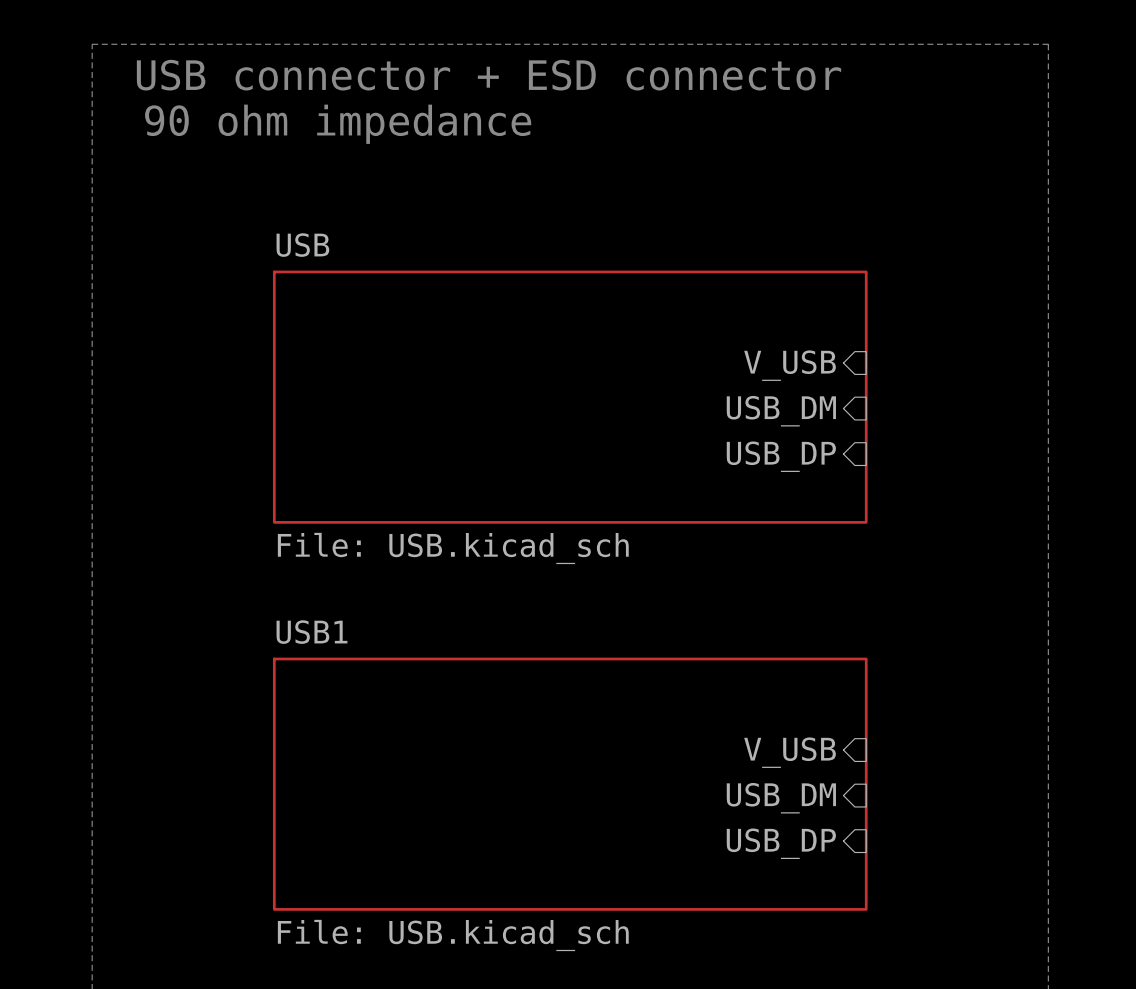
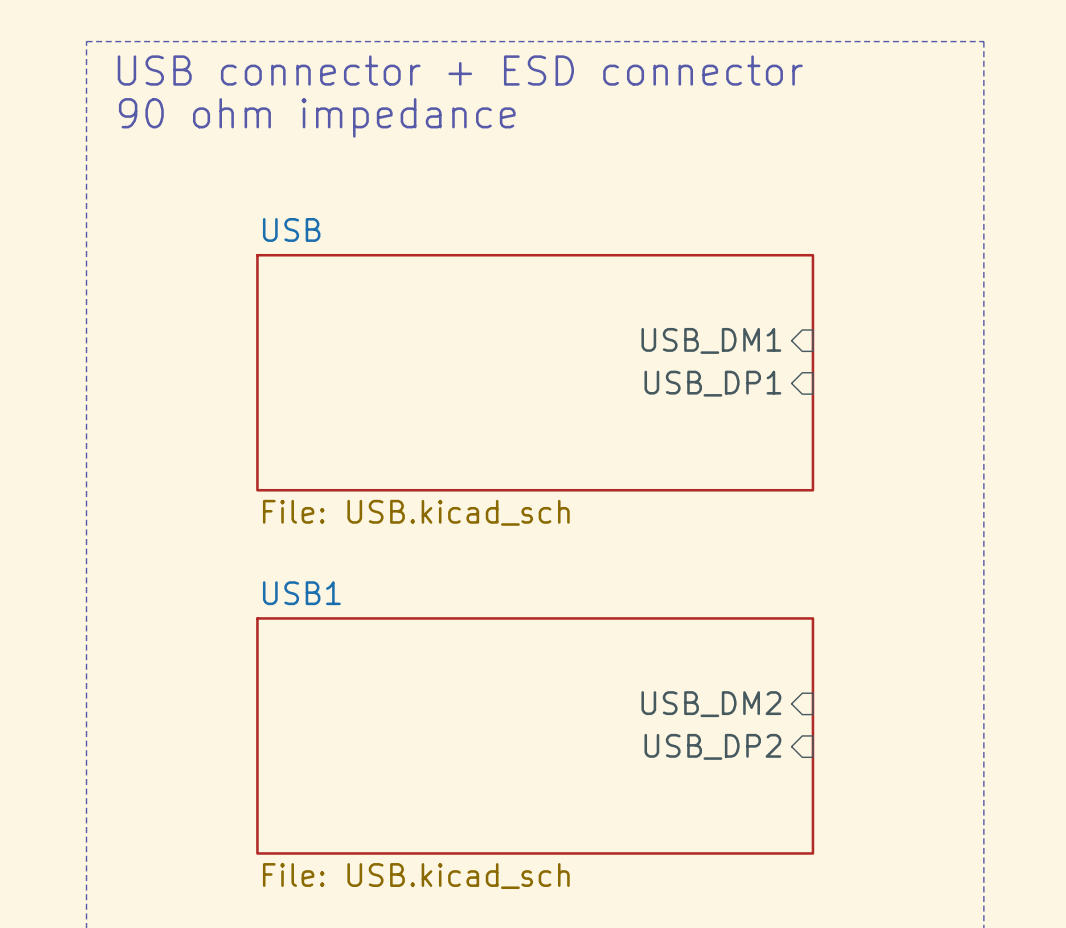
sheet pin: V_USB (790, 365) -> USB_DM1 (711, 340)
sheet pin: USB_DM (781, 411) -> USB_DP1 (712, 383)
sheet pin: USB_DP (781, 456) -> none
sheet pin: V_USB (790, 752) -> USB_DM2 (711, 704)
sheet pin: USB_DM (781, 798) -> USB_DP2 (712, 746)
sheet pin: USB_DP (781, 843) -> none

